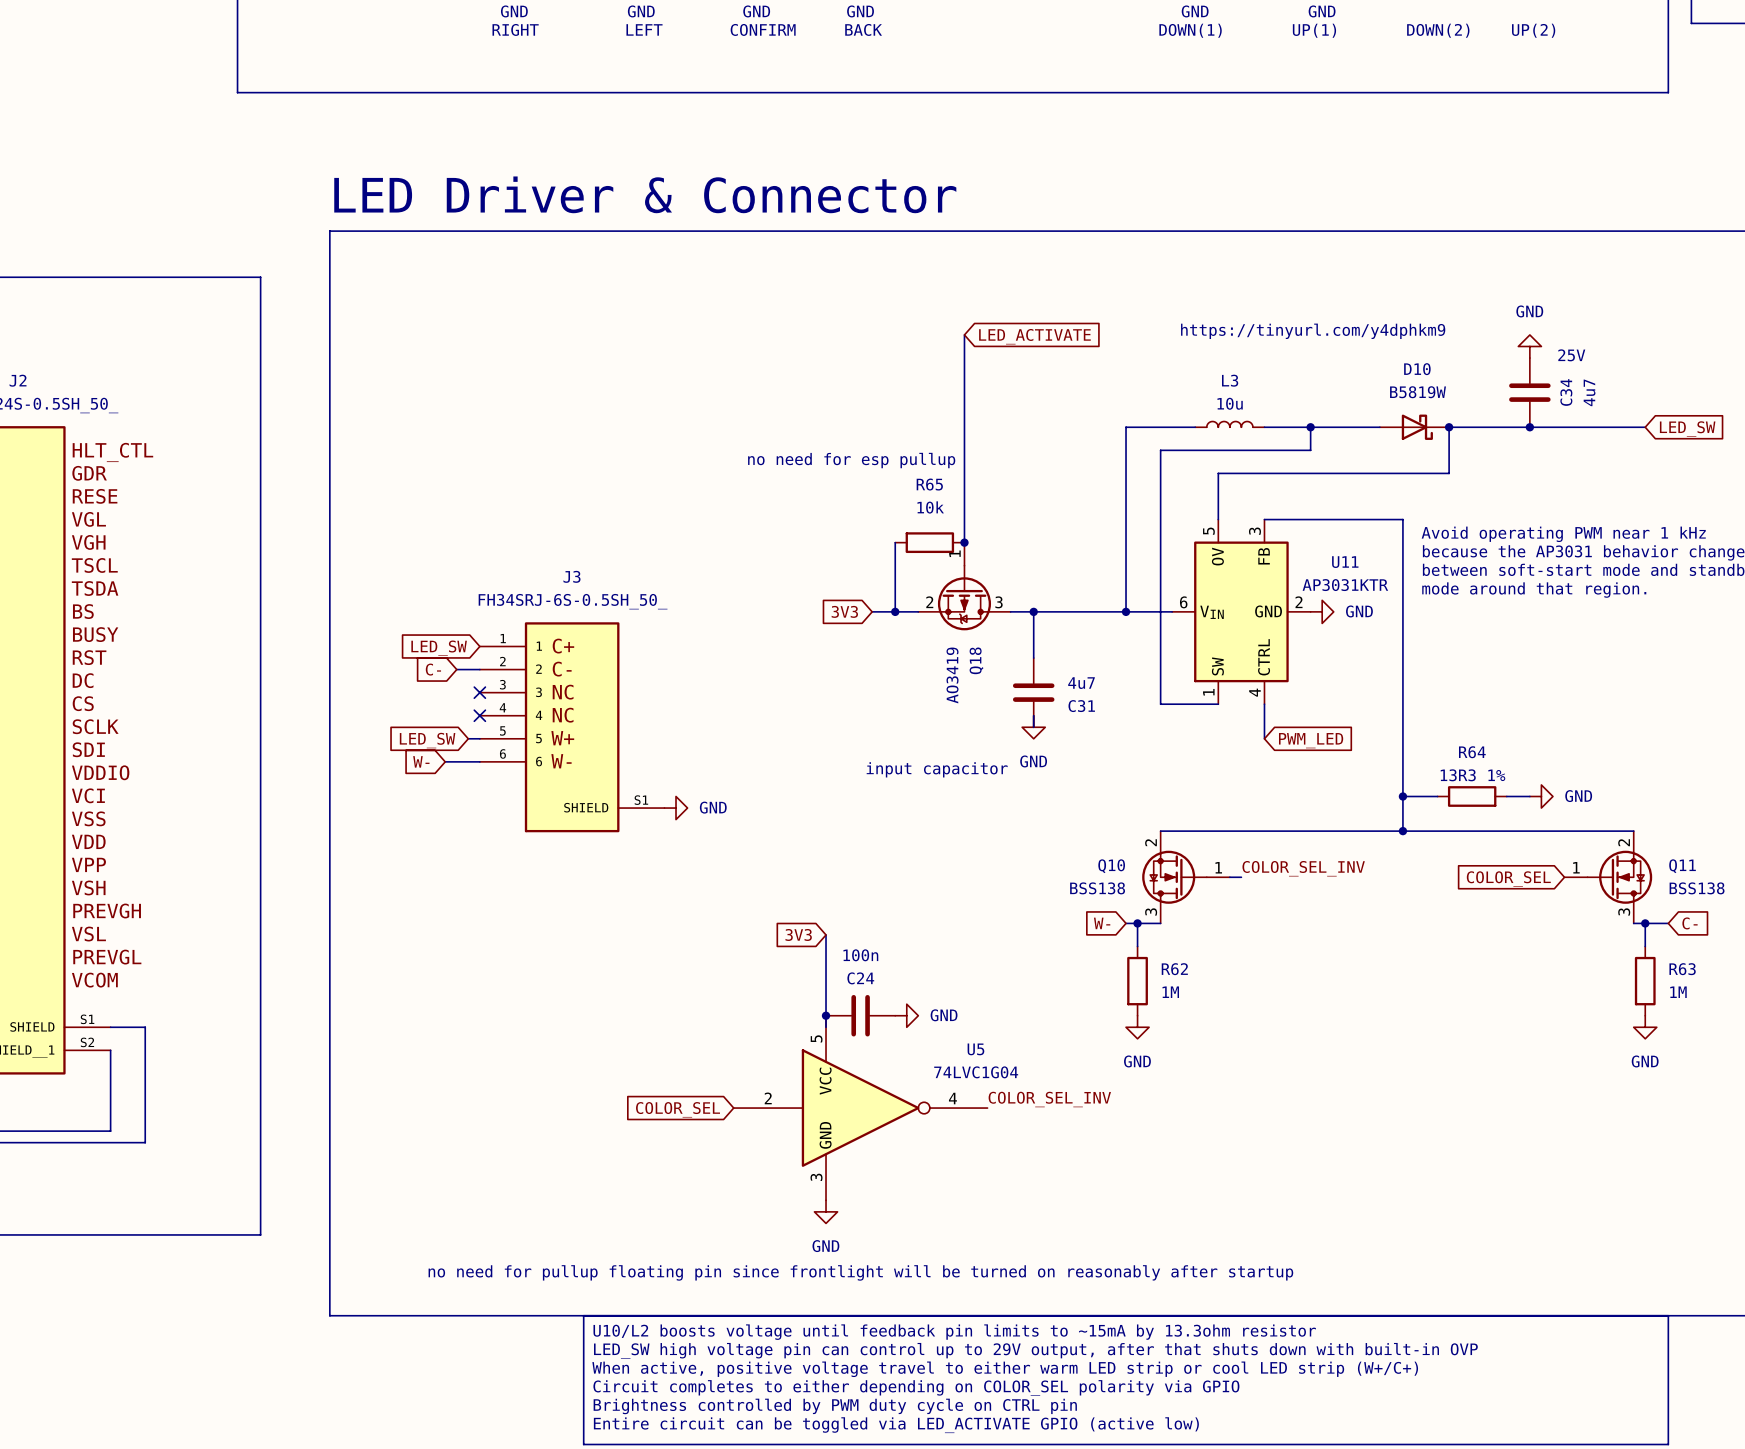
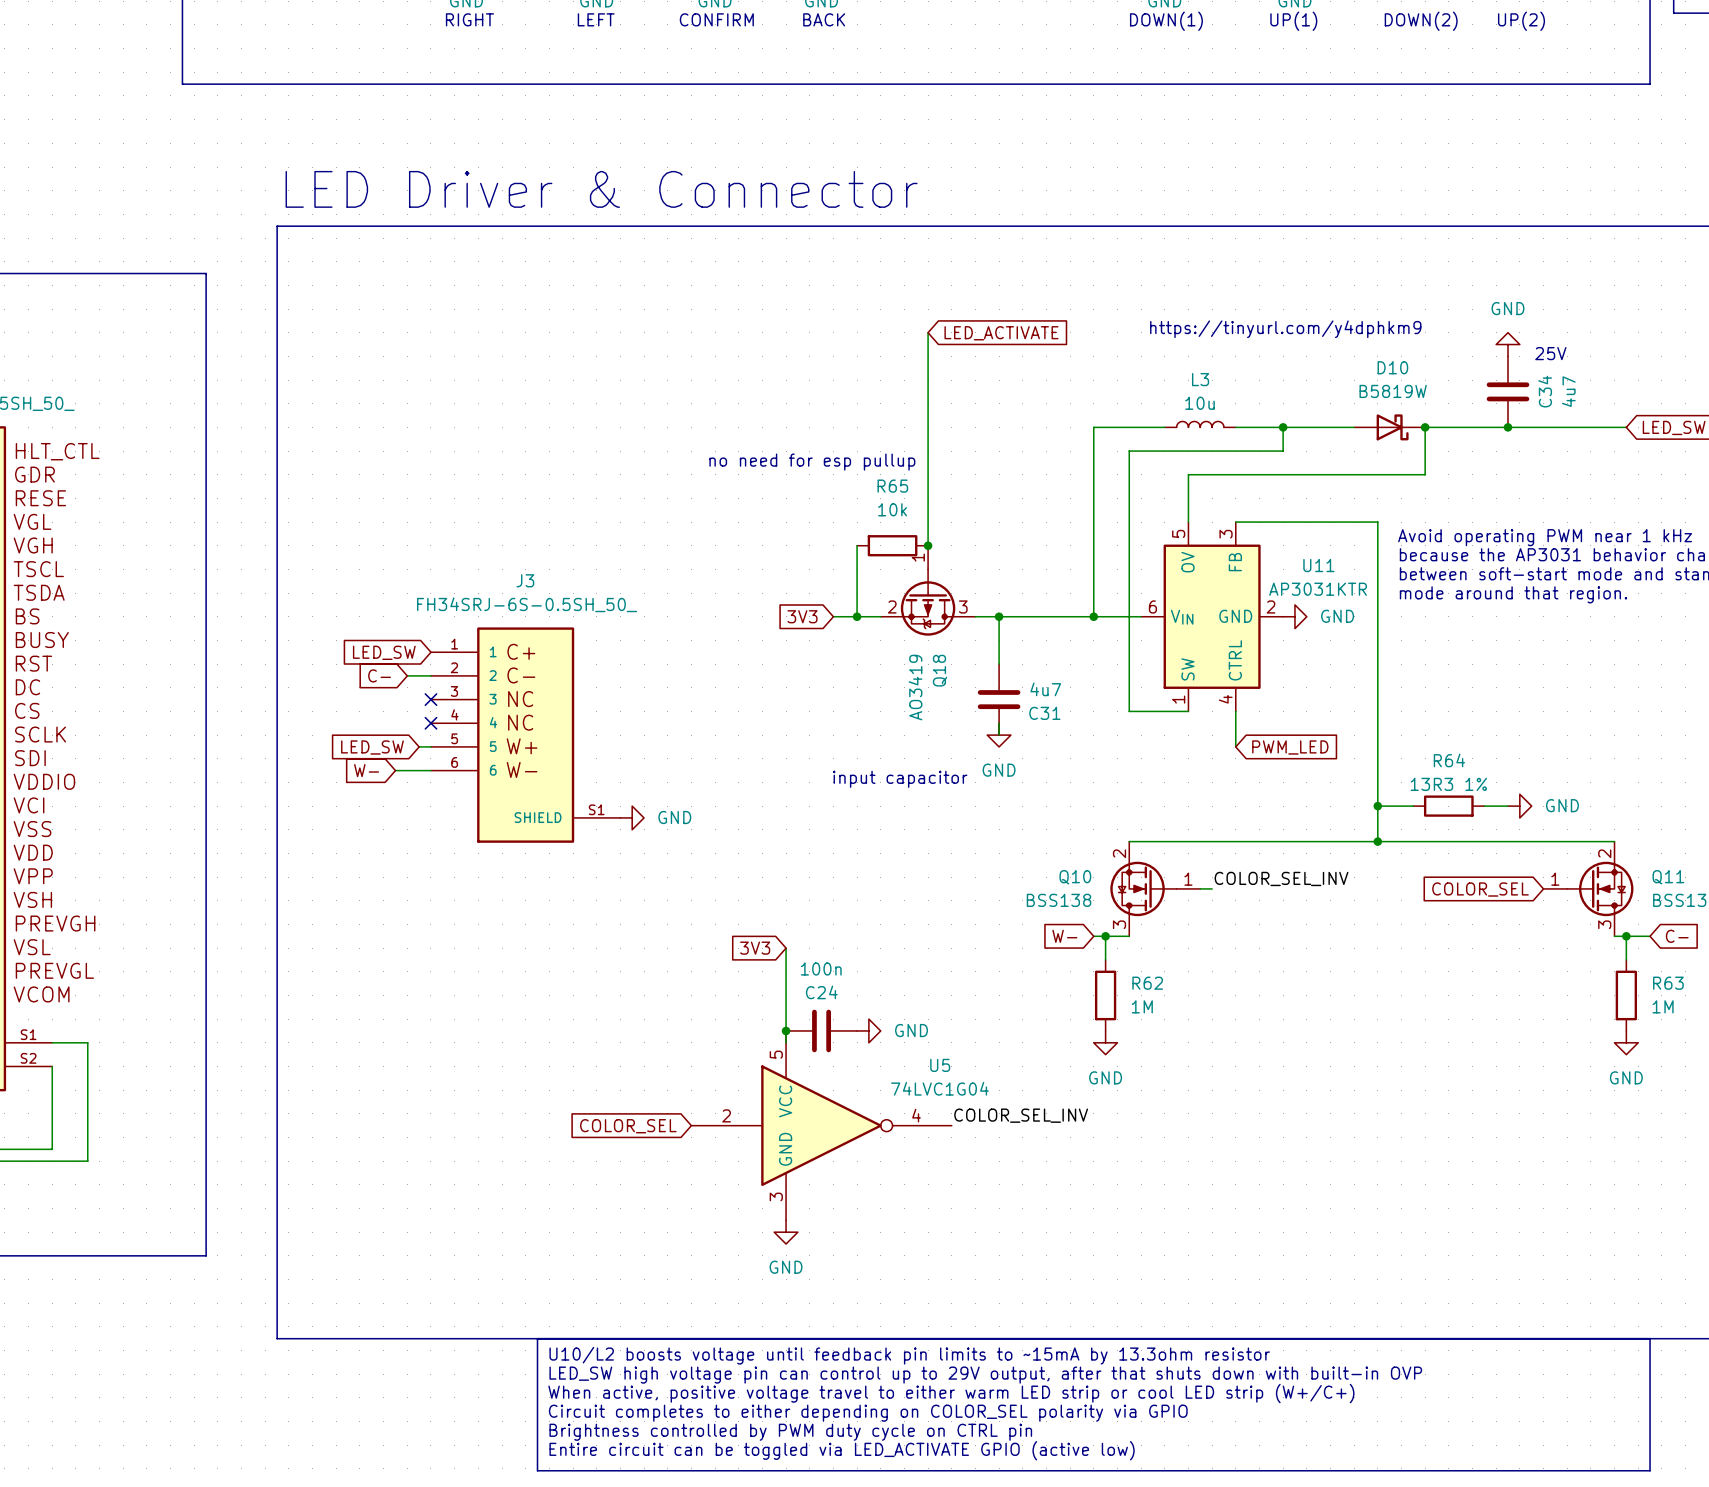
text: no need for pullup floating pin since frontlight will be turned on reasonably after startup (860, 1272) -> none

